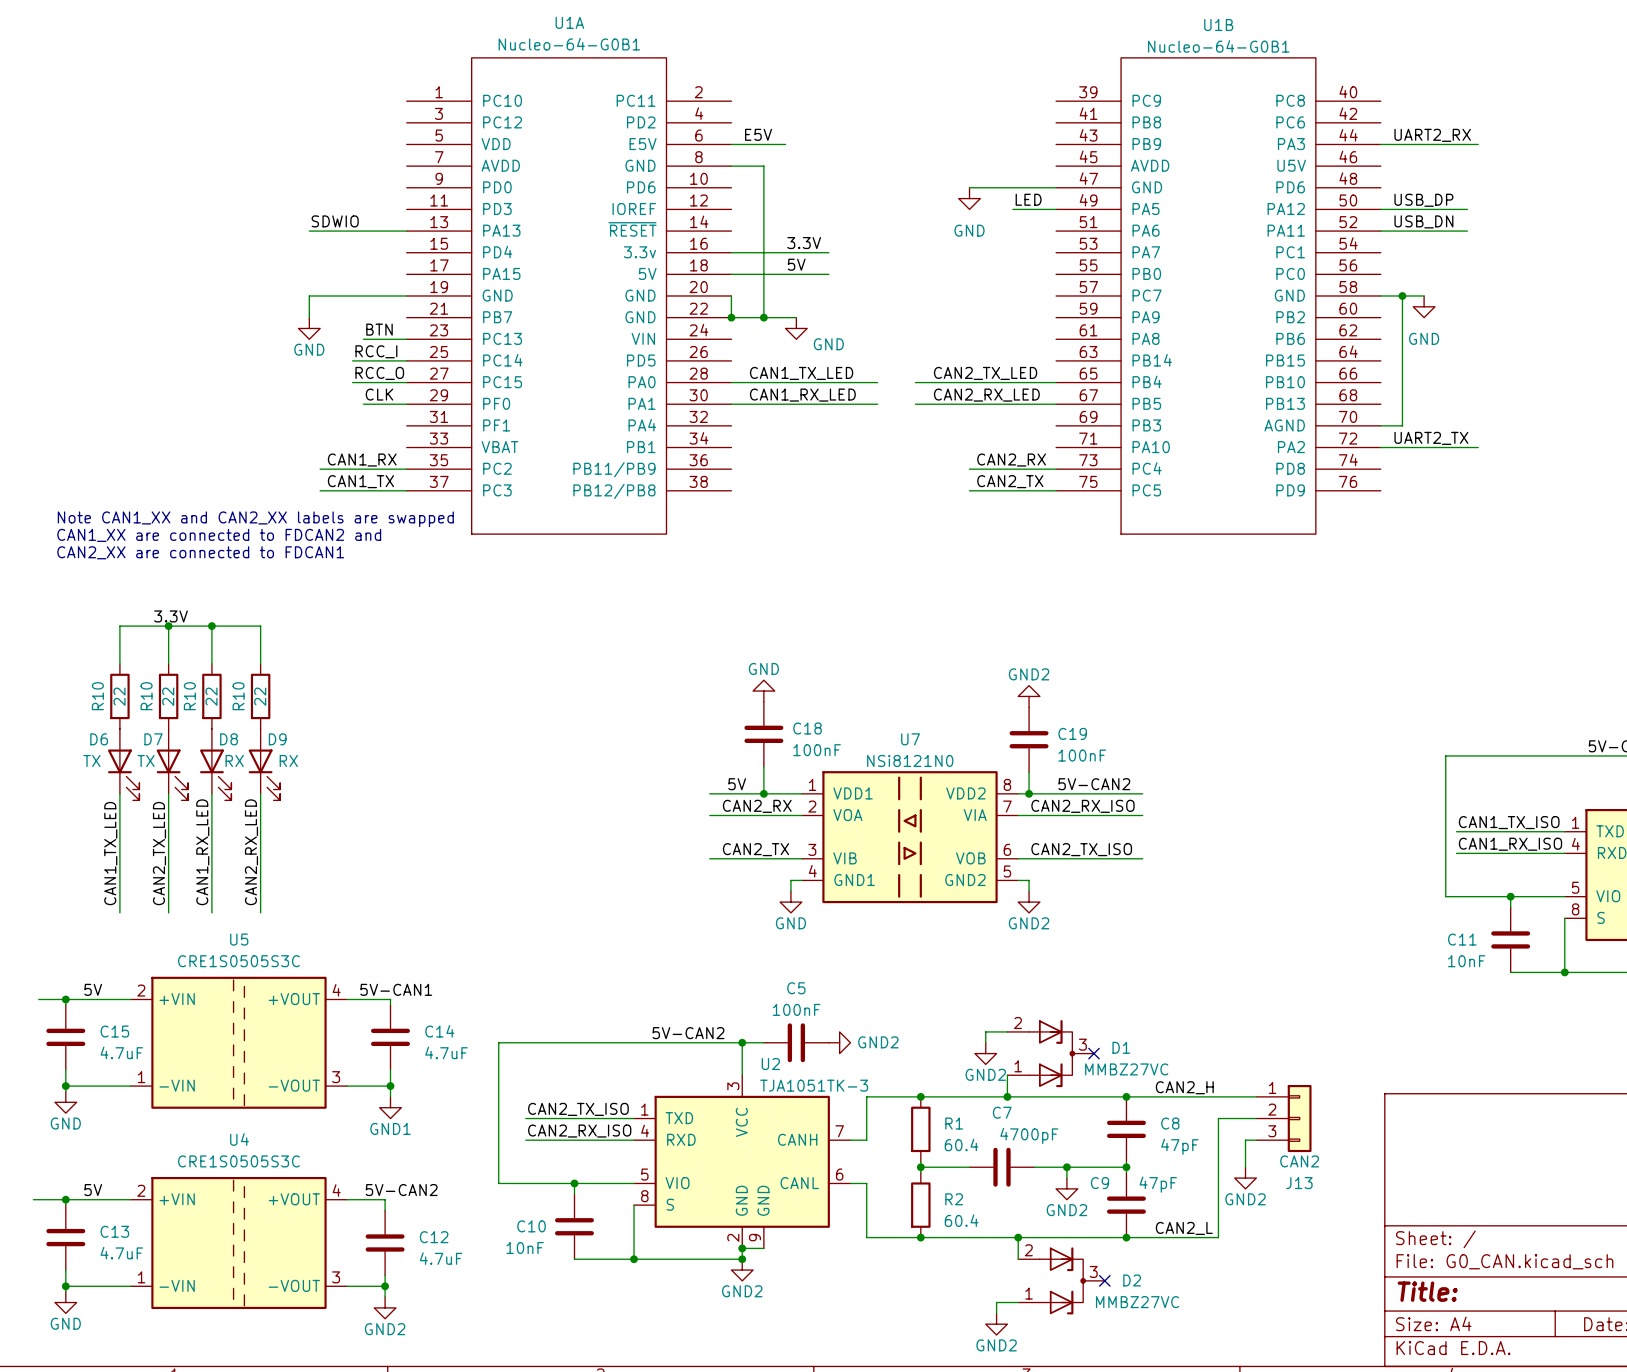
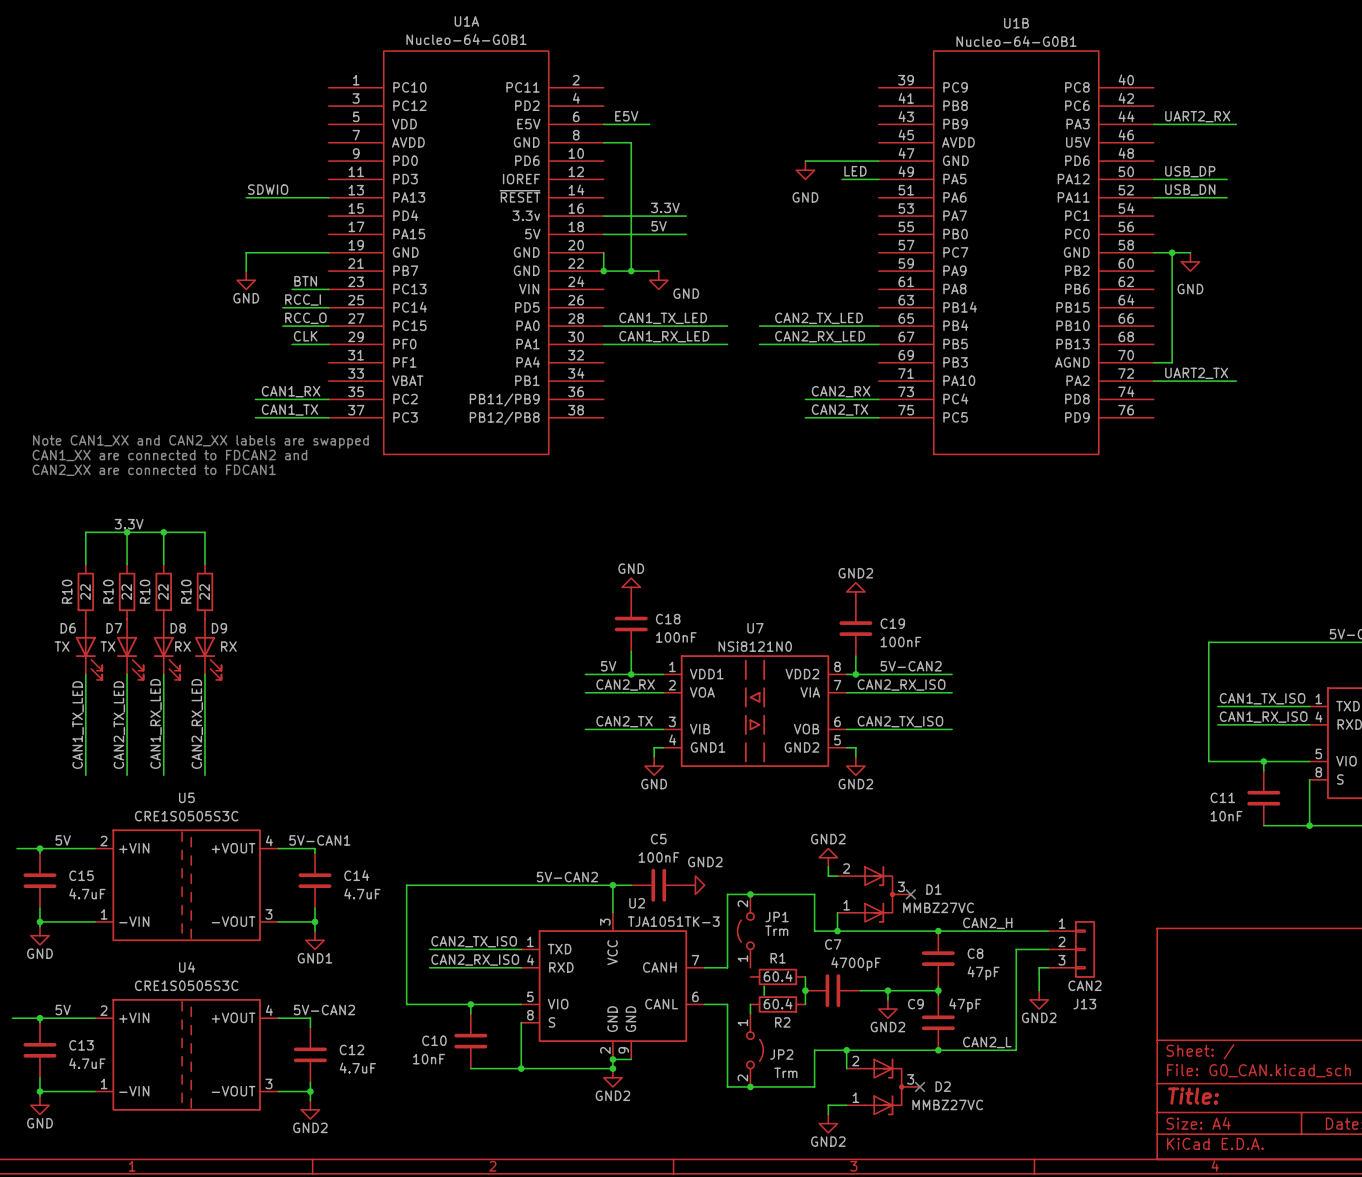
wire: (996, 1031) (985, 1031) (985, 1042) -> (828, 876) (828, 866)
power symbol text position: GND2 (878, 1042) -> GND2 (705, 862)
junction: none -> (750, 894)
power symbol rotation: 0° (985, 1053) -> 180° (828, 857)
power symbol position: GND2 (985, 1053) -> GND2 (828, 857)
JP1: none -> Trm (745, 931)
junction: (920, 1096) -> none
wire: (980, 1096) (866, 1096) (866, 1140) -> (814, 931) (814, 894) (727, 894) (727, 967) (718, 967)
R1 name position: R1 (954, 1123) -> R1 (778, 958)
R1 rotation: 0° (920, 1129) -> 90° clockwise (777, 976)
R1 value position: 60.4 (961, 1144) -> 60.4 (778, 976)
wire: none -> (805, 976) (805, 1004)
wire: (920, 1167) (969, 1167) -> none
junction: (920, 1167) -> none
junction: none -> (805, 990)
wire: (866, 1183) (866, 1237) (980, 1237) -> (718, 1004) (727, 1004) (727, 1086) (814, 1086) (814, 1050)
wire: none -> (750, 1004) (750, 1013)
R2 rotation: 0° (920, 1205) -> 90° clockwise (777, 1004)
R2 value position: 60.4 (961, 1220) -> 60.4 (778, 1003)
JP2: none -> Trm (755, 1050)
junction: (920, 1237) -> none
junction: none -> (750, 1086)

